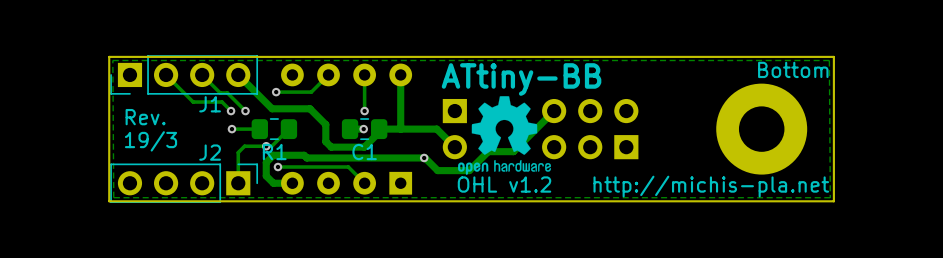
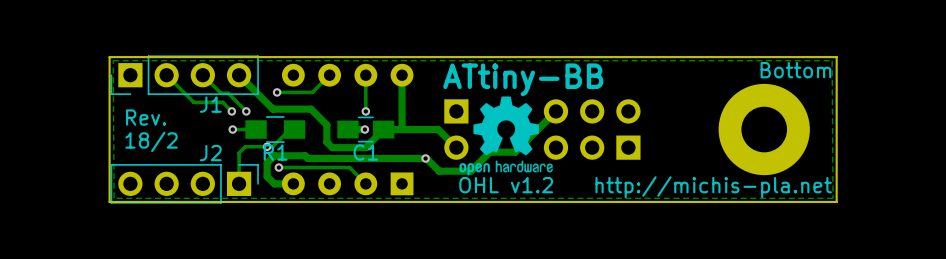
R1 footprint: [251, 118, 298, 141] -> [245, 116, 306, 143]
C1 footprint: [341, 118, 388, 141] -> [337, 116, 395, 143]
text: 19/3 (151, 141) -> 18/2 (151, 141)

